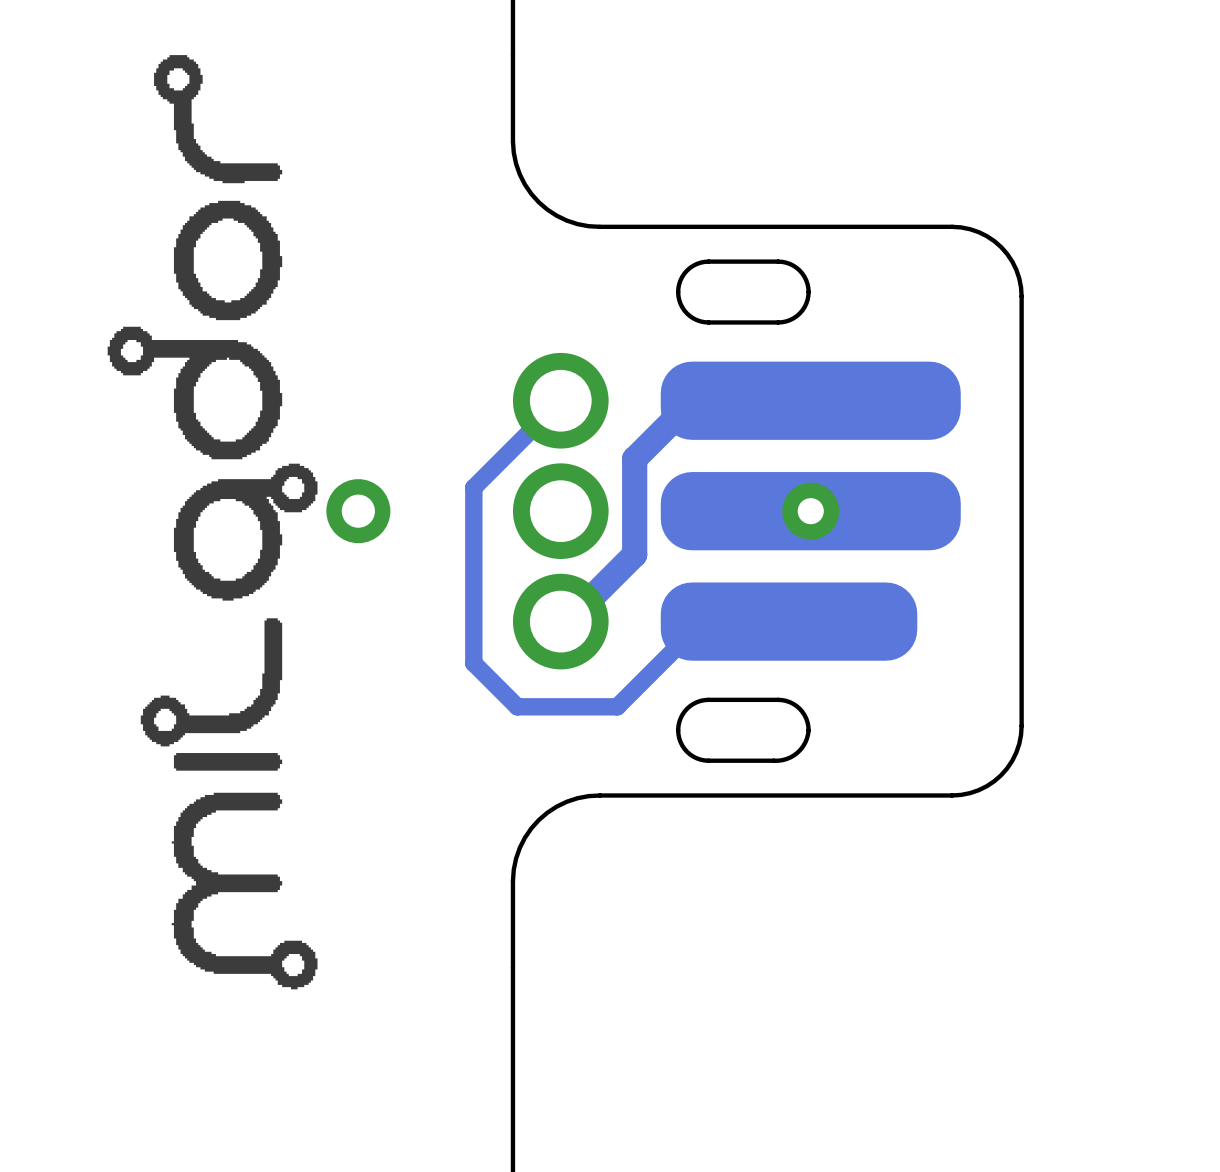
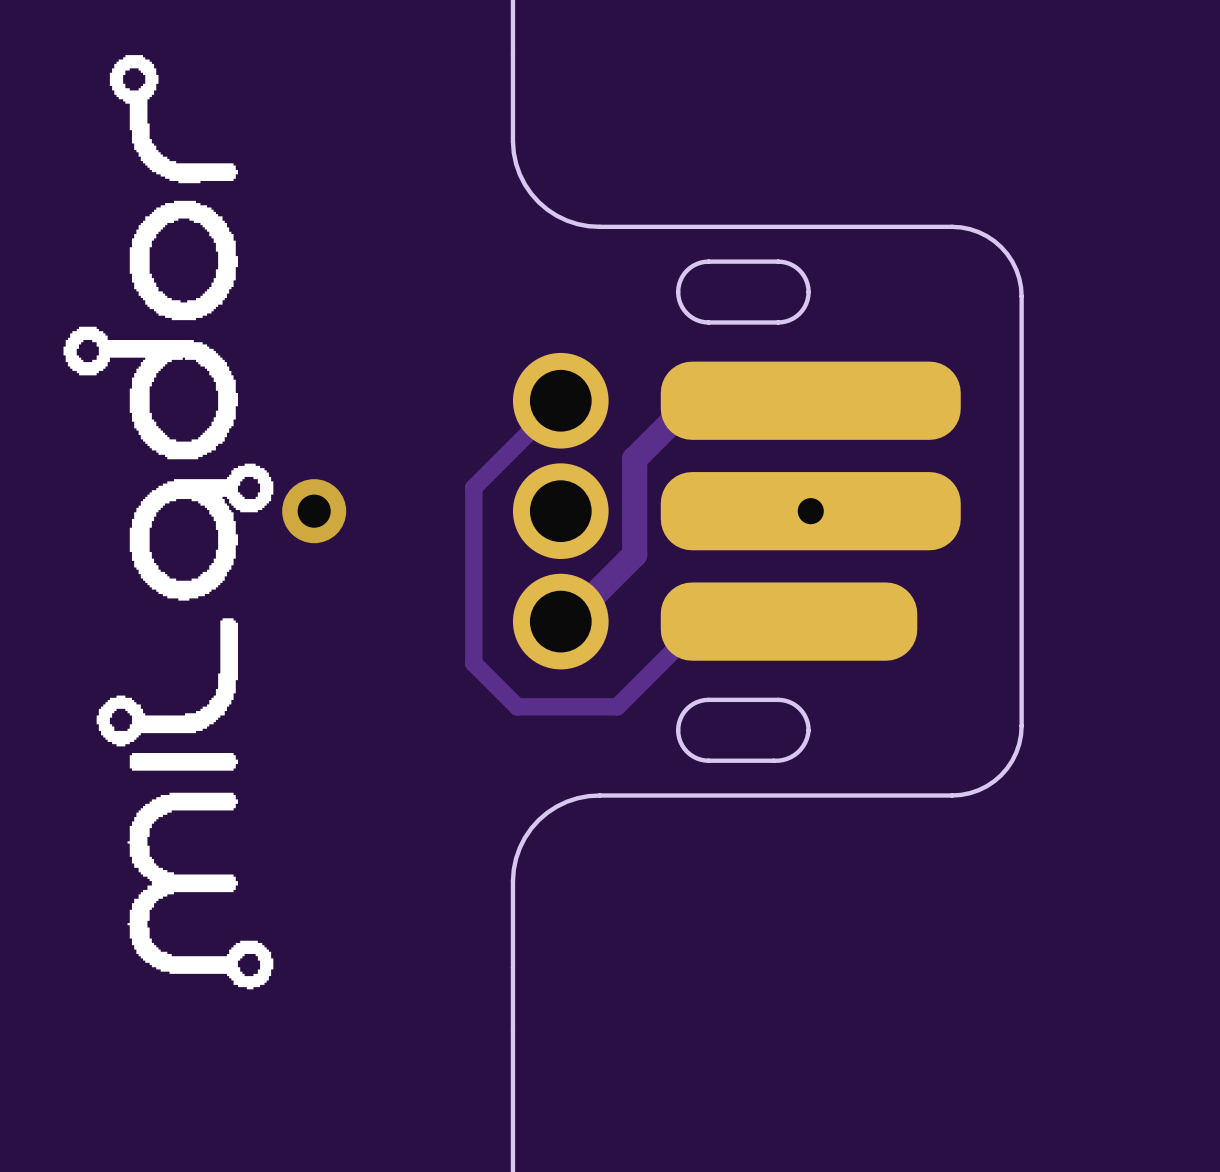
via position: (358, 511) -> (314, 511)
drawing position: (212, 522) -> (168, 522)

